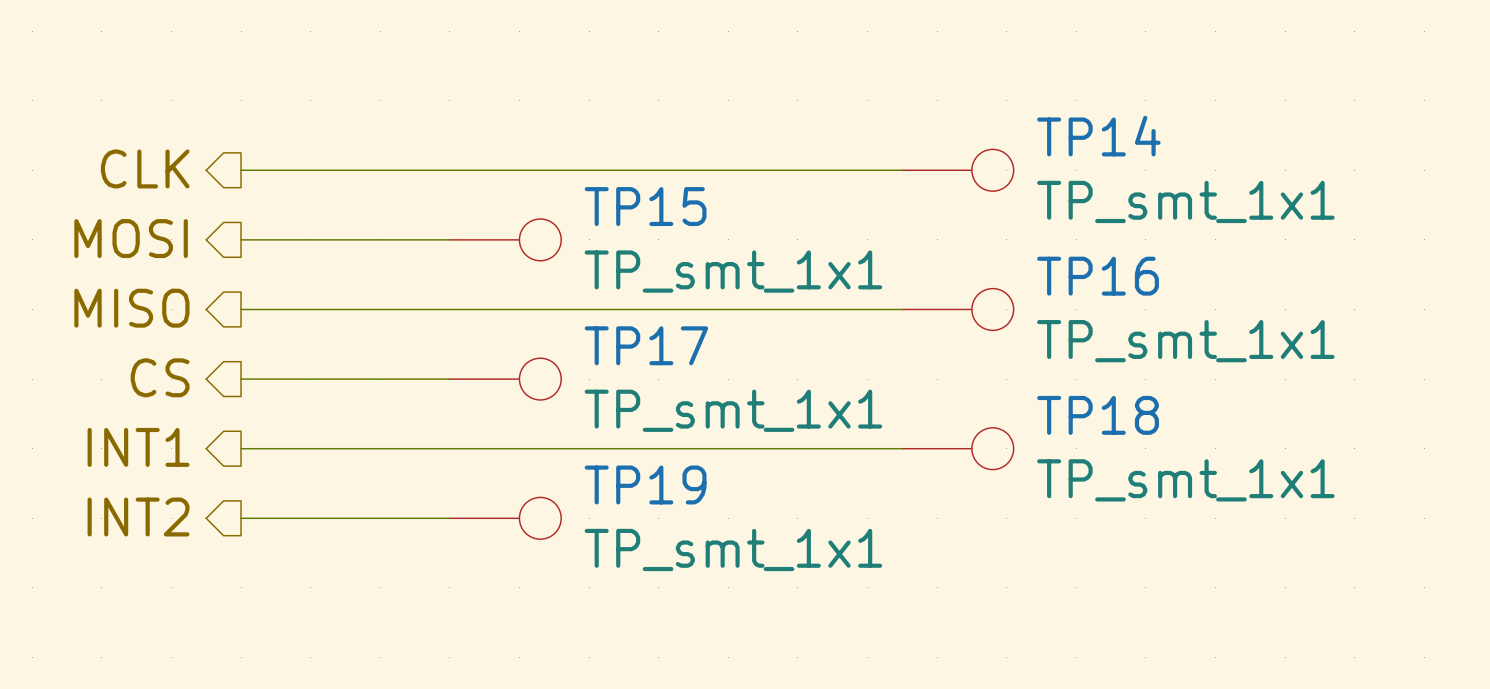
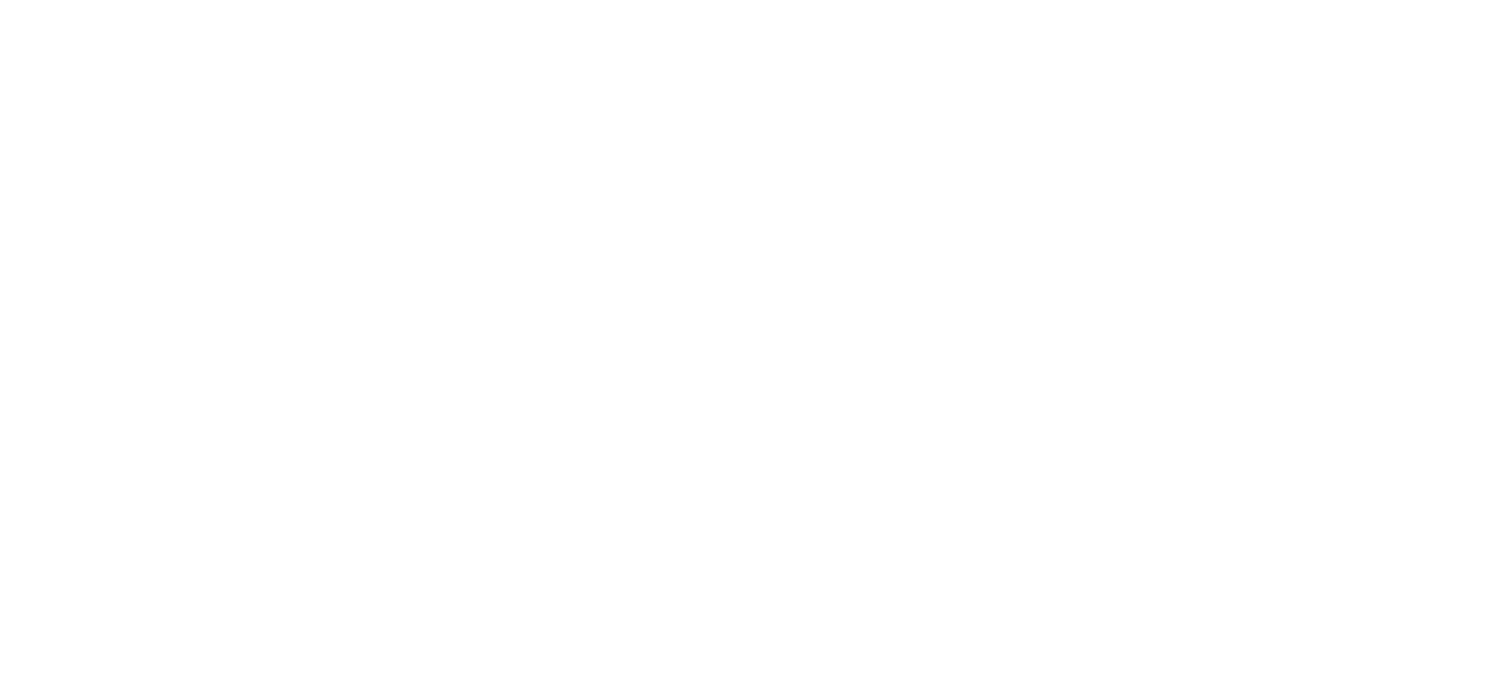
hierarchical label: CLK (145, 168) -> none
wire: (241, 170) (902, 170) -> none
TP14: TP_smt_1x1 (957, 170) -> none
hierarchical label: MOSI (131, 238) -> none
wire: (241, 239) (449, 239) -> none
TP15: TP_smt_1x1 (505, 239) -> none
hierarchical label: MISO (131, 308) -> none
wire: (241, 309) (902, 309) -> none
TP16: TP_smt_1x1 (957, 309) -> none
hierarchical label: CS (160, 377) -> none
wire: (241, 379) (449, 379) -> none
TP17: TP_smt_1x1 (505, 379) -> none
hierarchical label: INT1 (138, 447) -> none
wire: (241, 448) (902, 448) -> none
TP18: TP_smt_1x1 (957, 448) -> none
hierarchical label: INT2 (138, 517) -> none
wire: (241, 518) (449, 518) -> none
TP19: TP_smt_1x1 (505, 518) -> none

